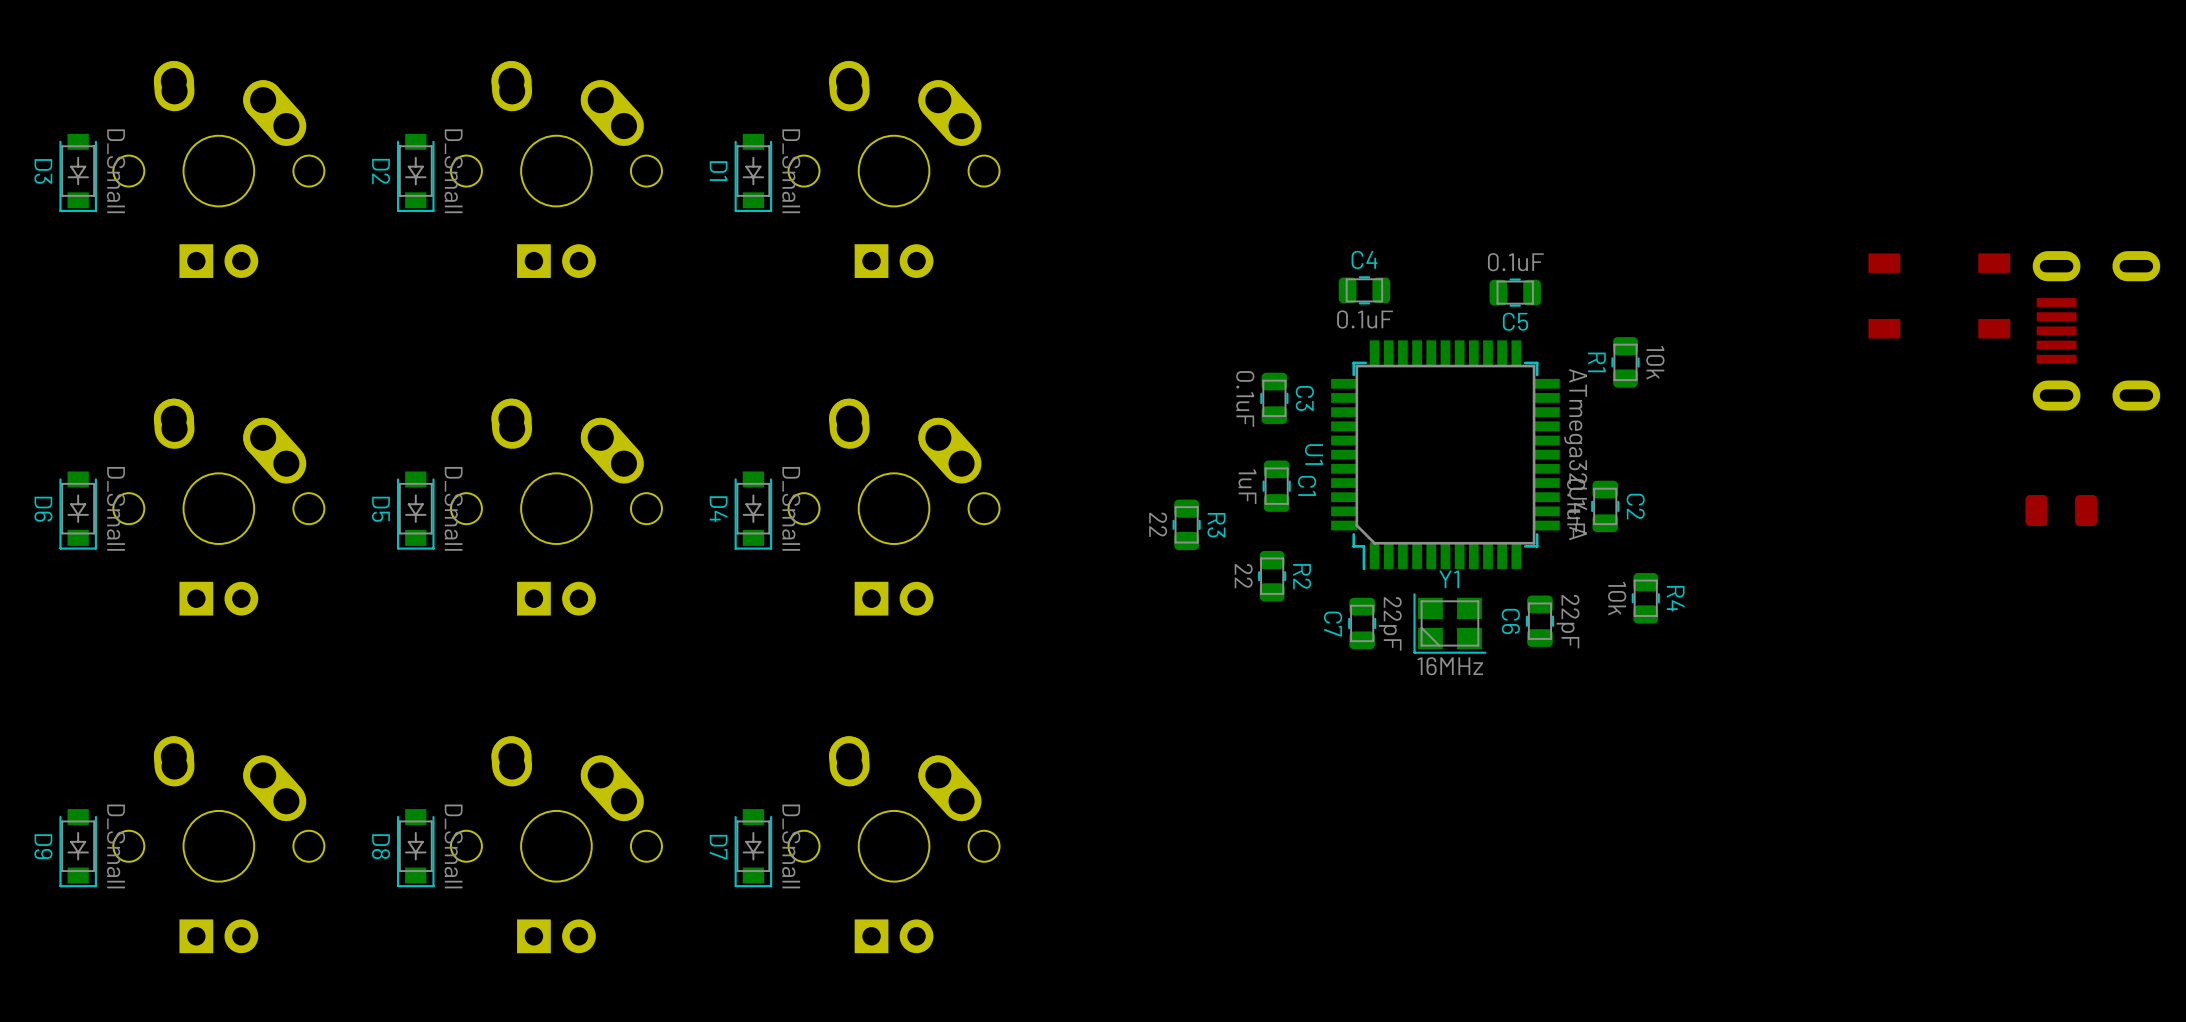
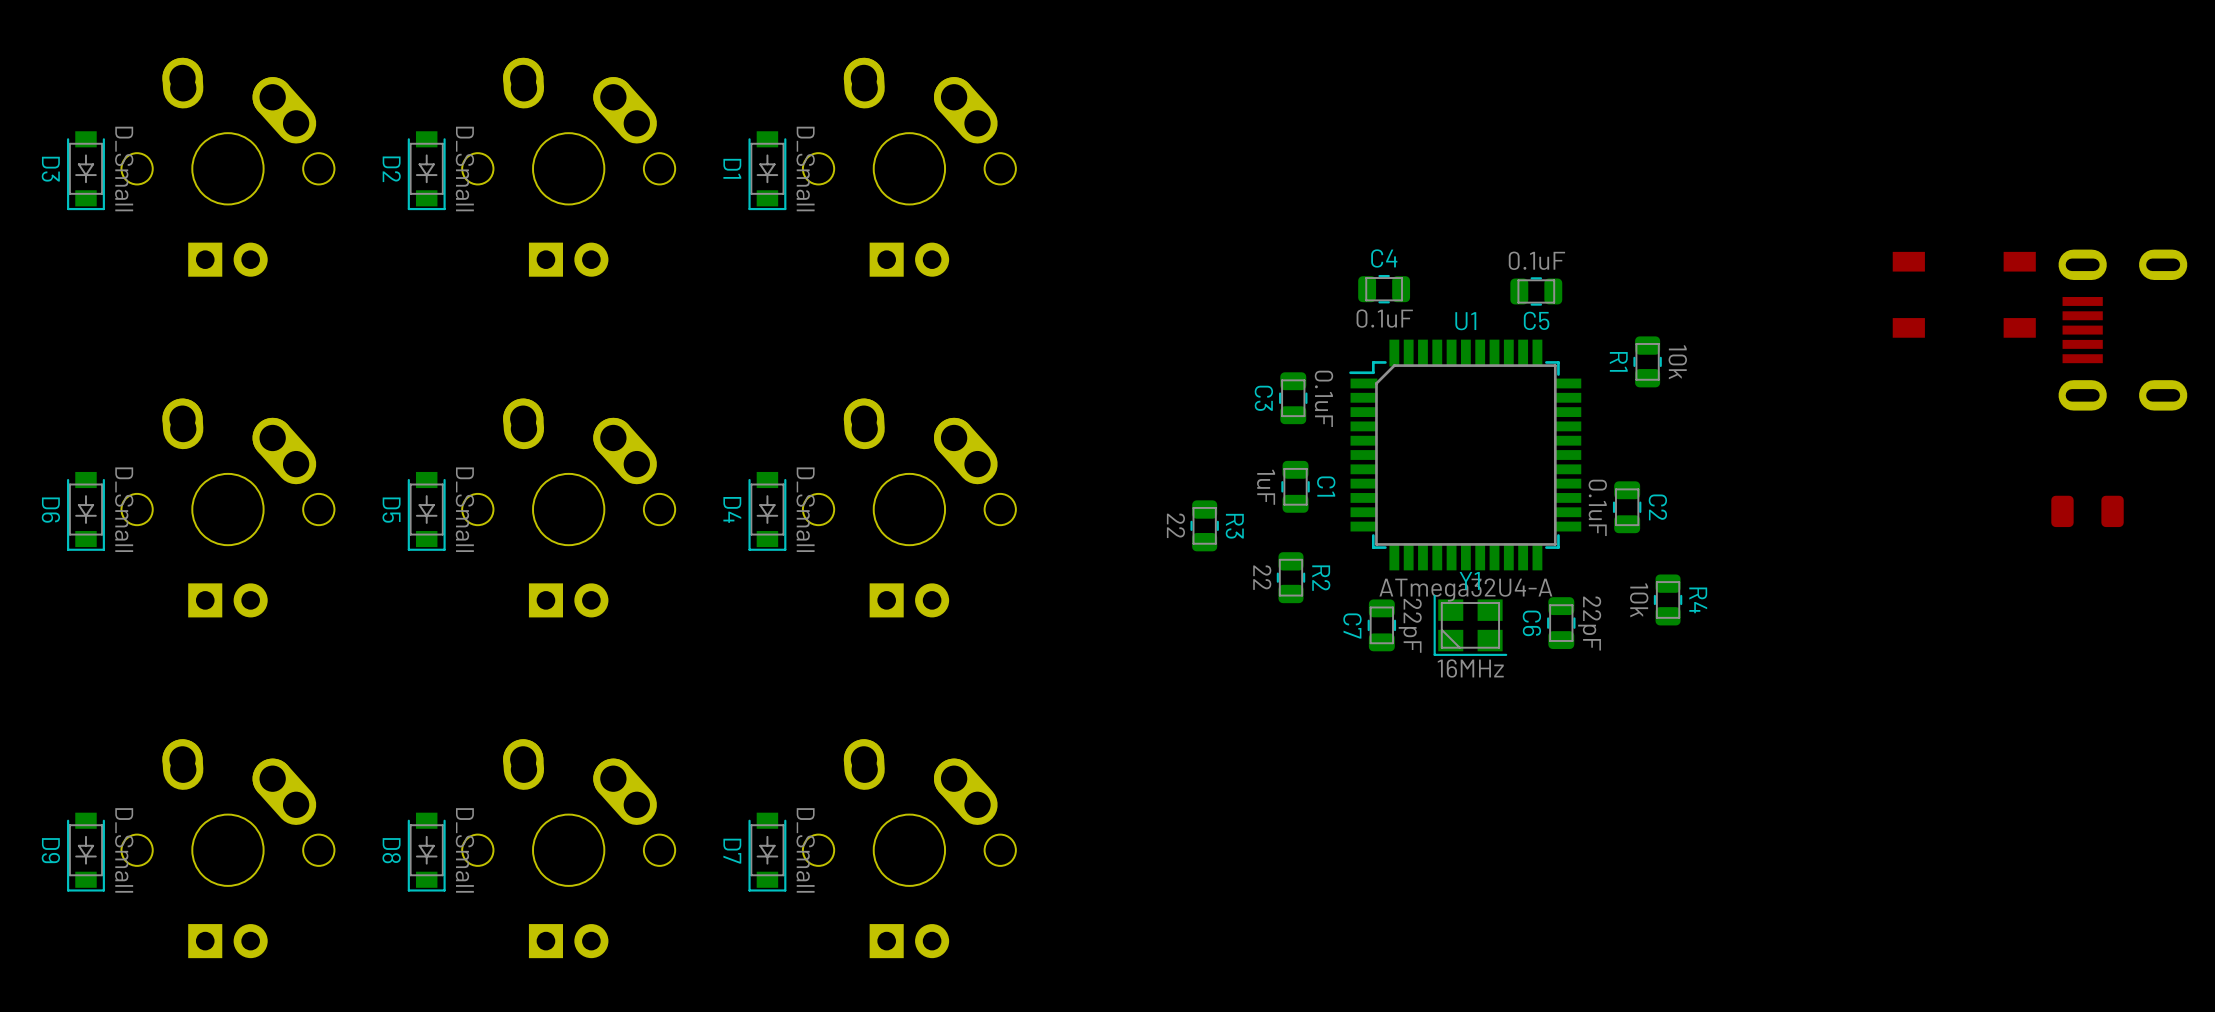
C3 name position: C3 (1304, 398) -> C3 (1263, 398)
C3 value position: 0.1uF (1245, 399) -> 0.1uF (1323, 398)
U1 rotation: 0° (1445, 455) -> 90° clockwise (1465, 455)

